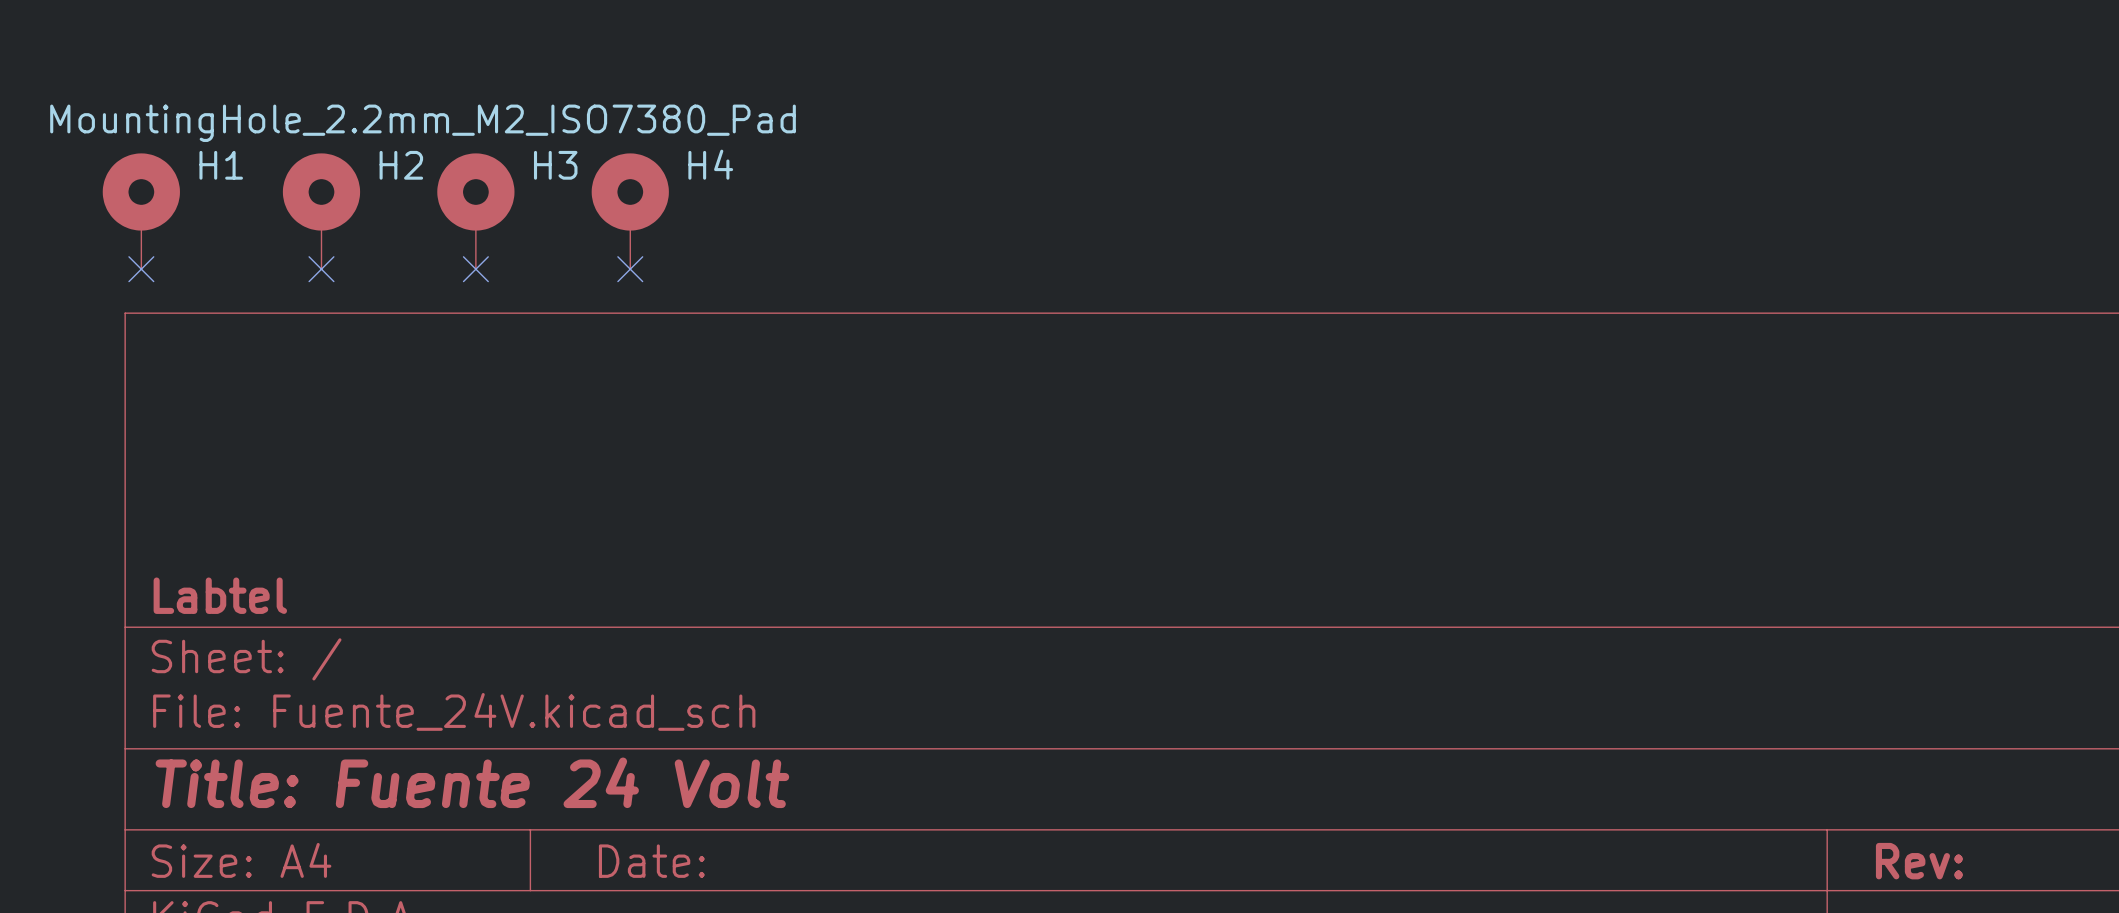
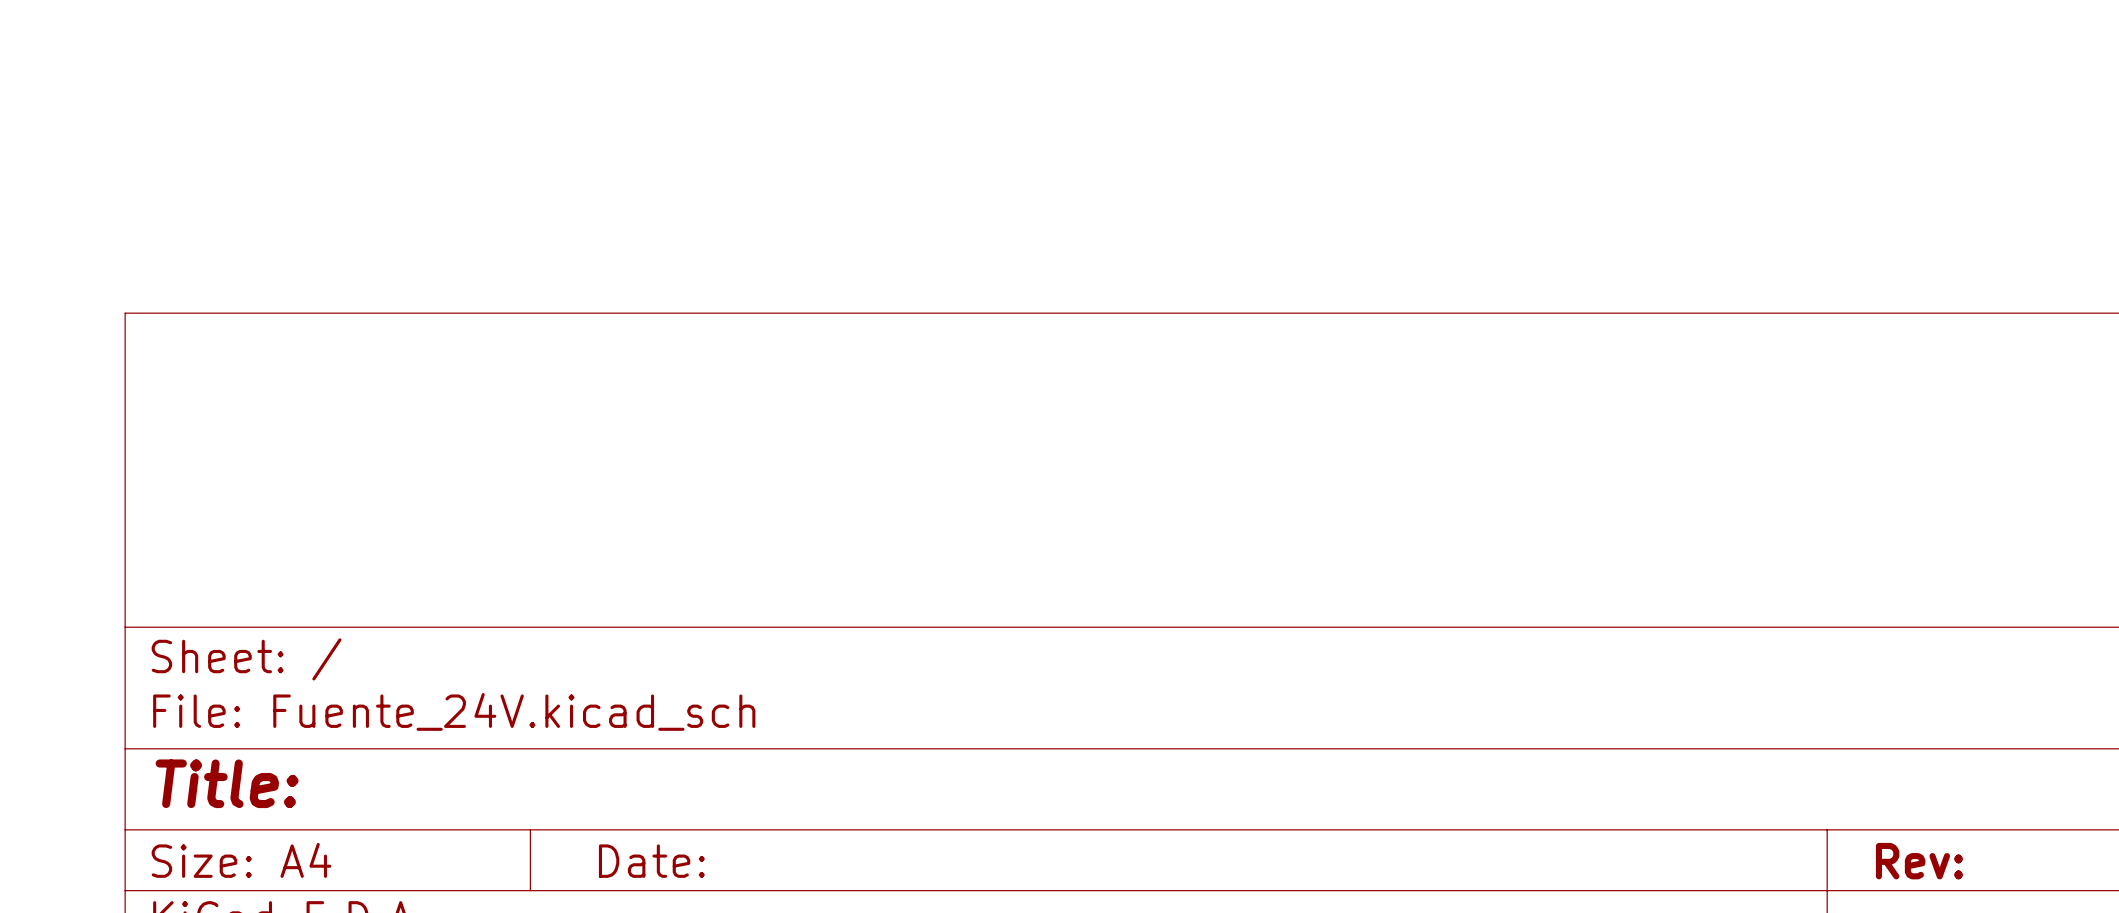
H1: (141, 211) -> none
H2: MountingHole_2.2mm_M2_ISO7380_Pad (321, 211) -> none
H3: (475, 211) -> none
H4: (630, 211) -> none
no-connect mark: (141, 269) -> none
no-connect mark: (321, 269) -> none
no-connect mark: (475, 269) -> none
no-connect mark: (630, 269) -> none
title block: Labtel (220, 595) -> none
title block: Title: Fuente 24 Volt (472, 782) -> Title: (227, 783)

